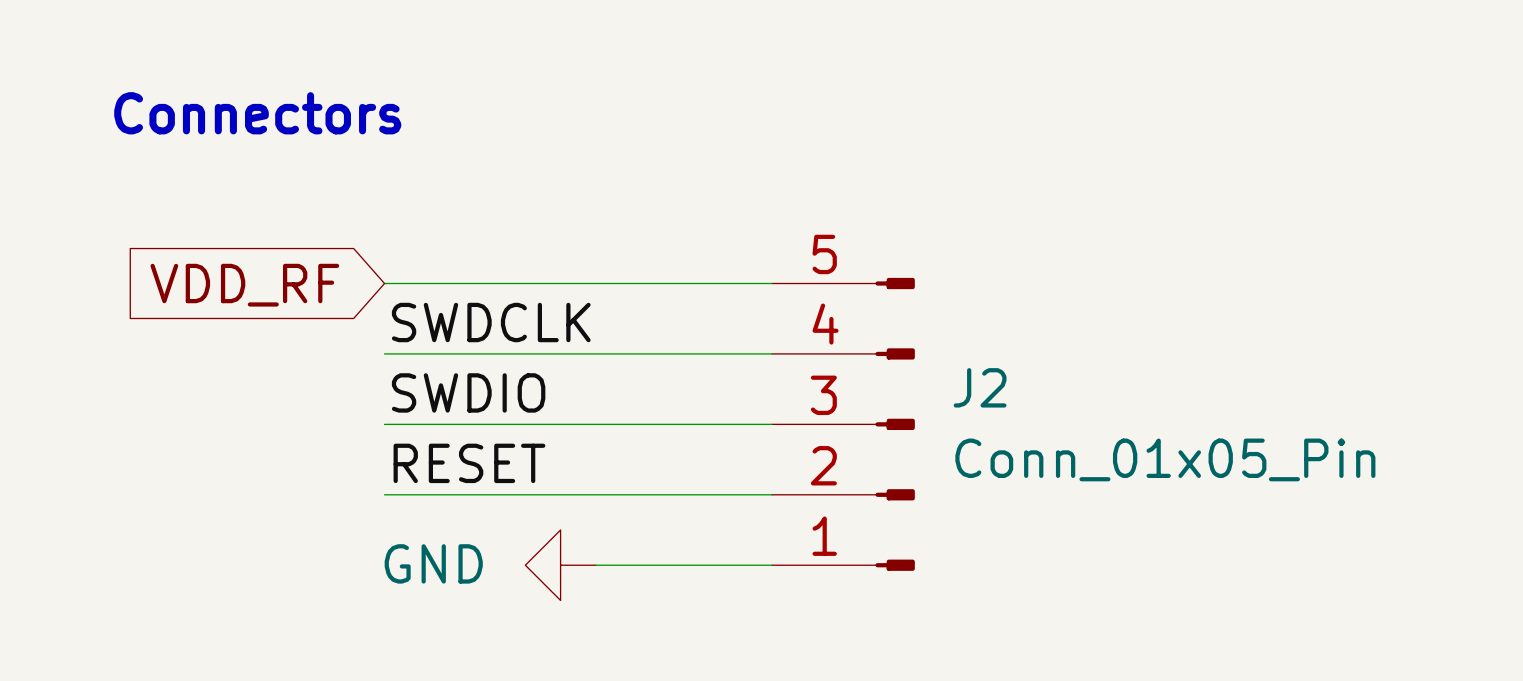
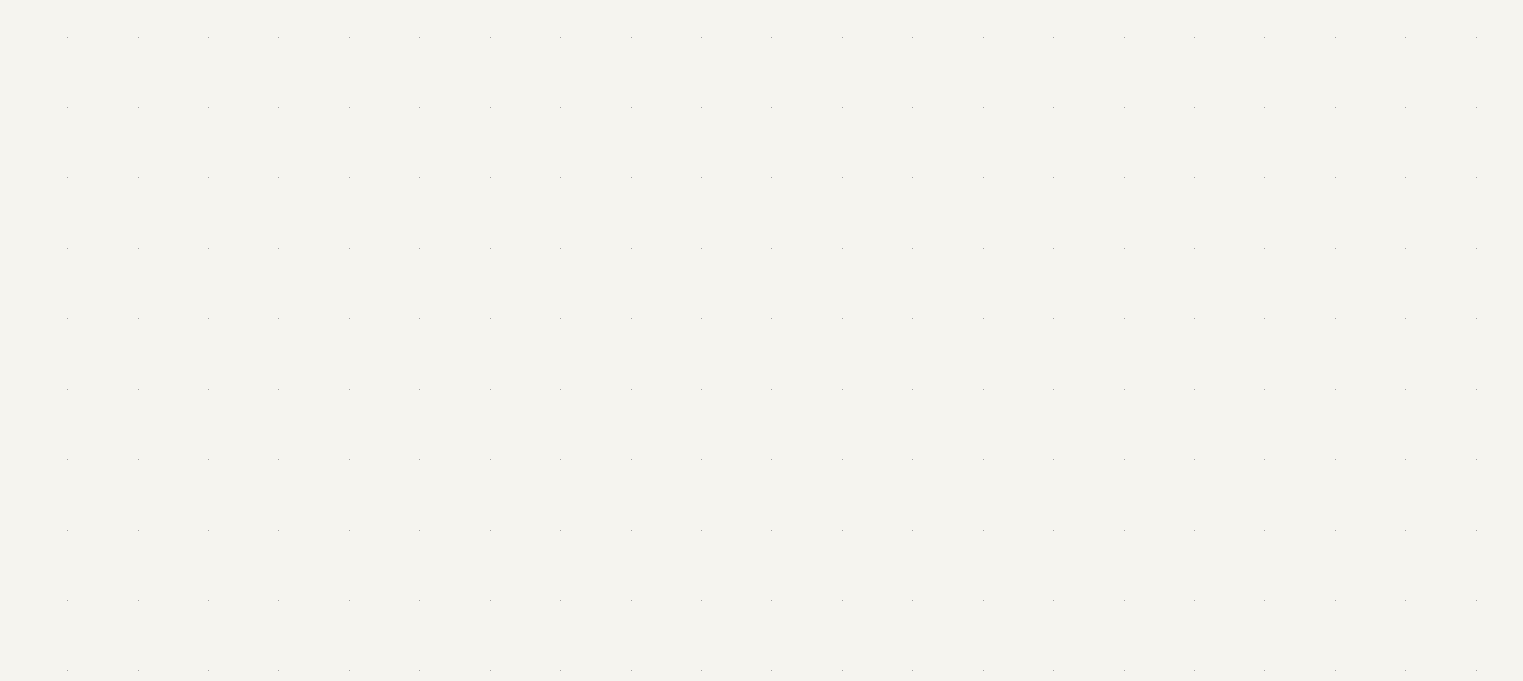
text: Connectors (257, 113) -> none
wire: (384, 283) (771, 283) -> none
global label: VDD_RF (244, 285) -> none
label: SWDCLK (491, 322) -> none
wire: (384, 353) (771, 353) -> none
label: SWDIO (468, 392) -> none
wire: (384, 424) (771, 424) -> none
J2: Conn_01x05_Pin (843, 424) -> none
label: RESET (469, 463) -> none
wire: (384, 494) (771, 494) -> none
power symbol: GND (560, 565) -> none
wire: (595, 565) (771, 565) -> none

